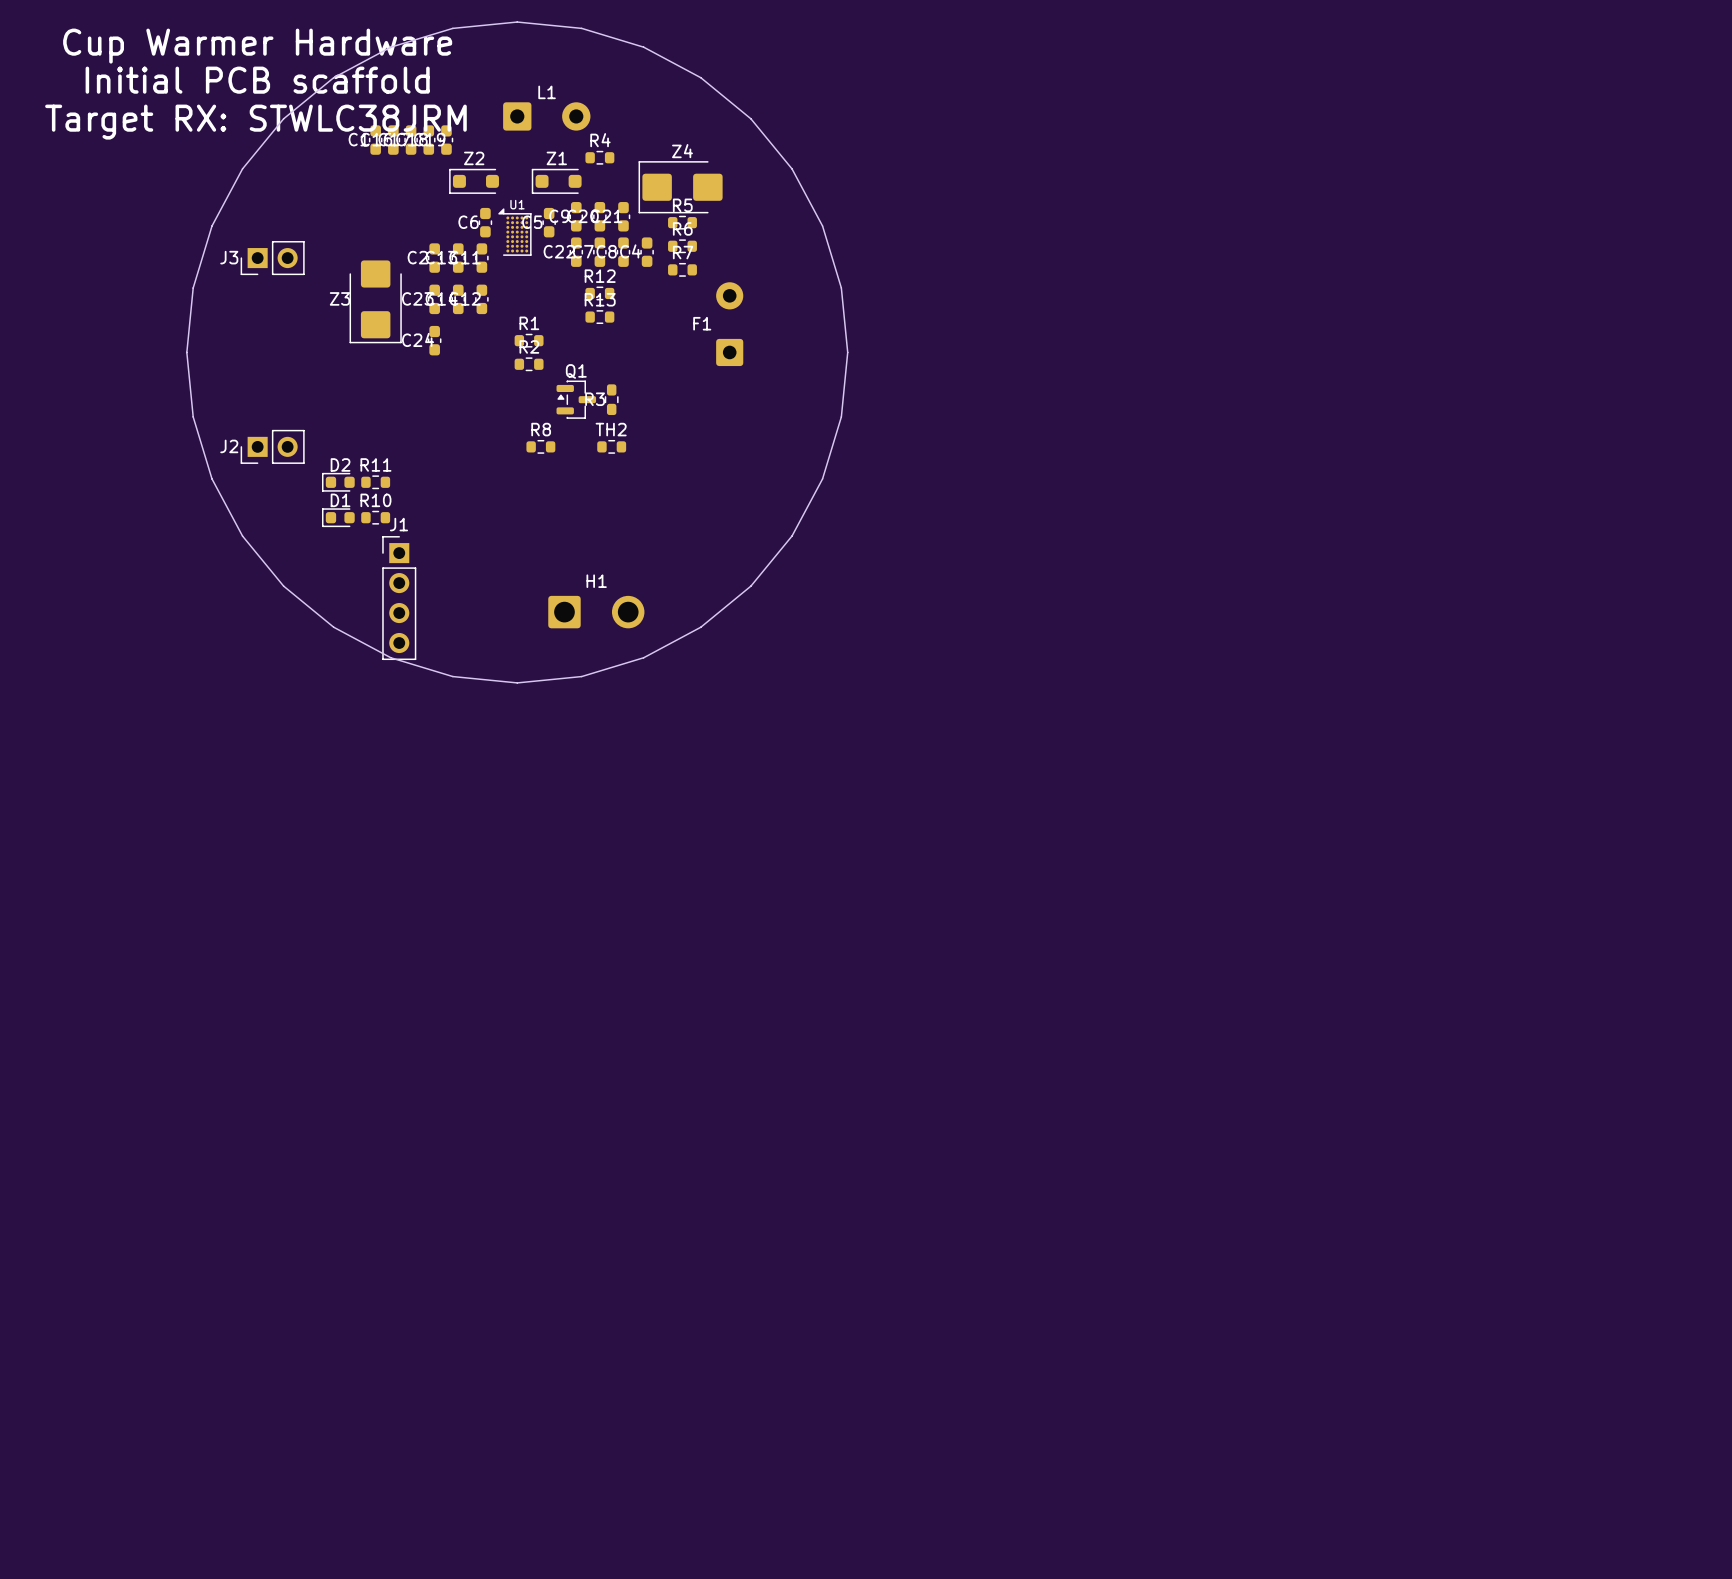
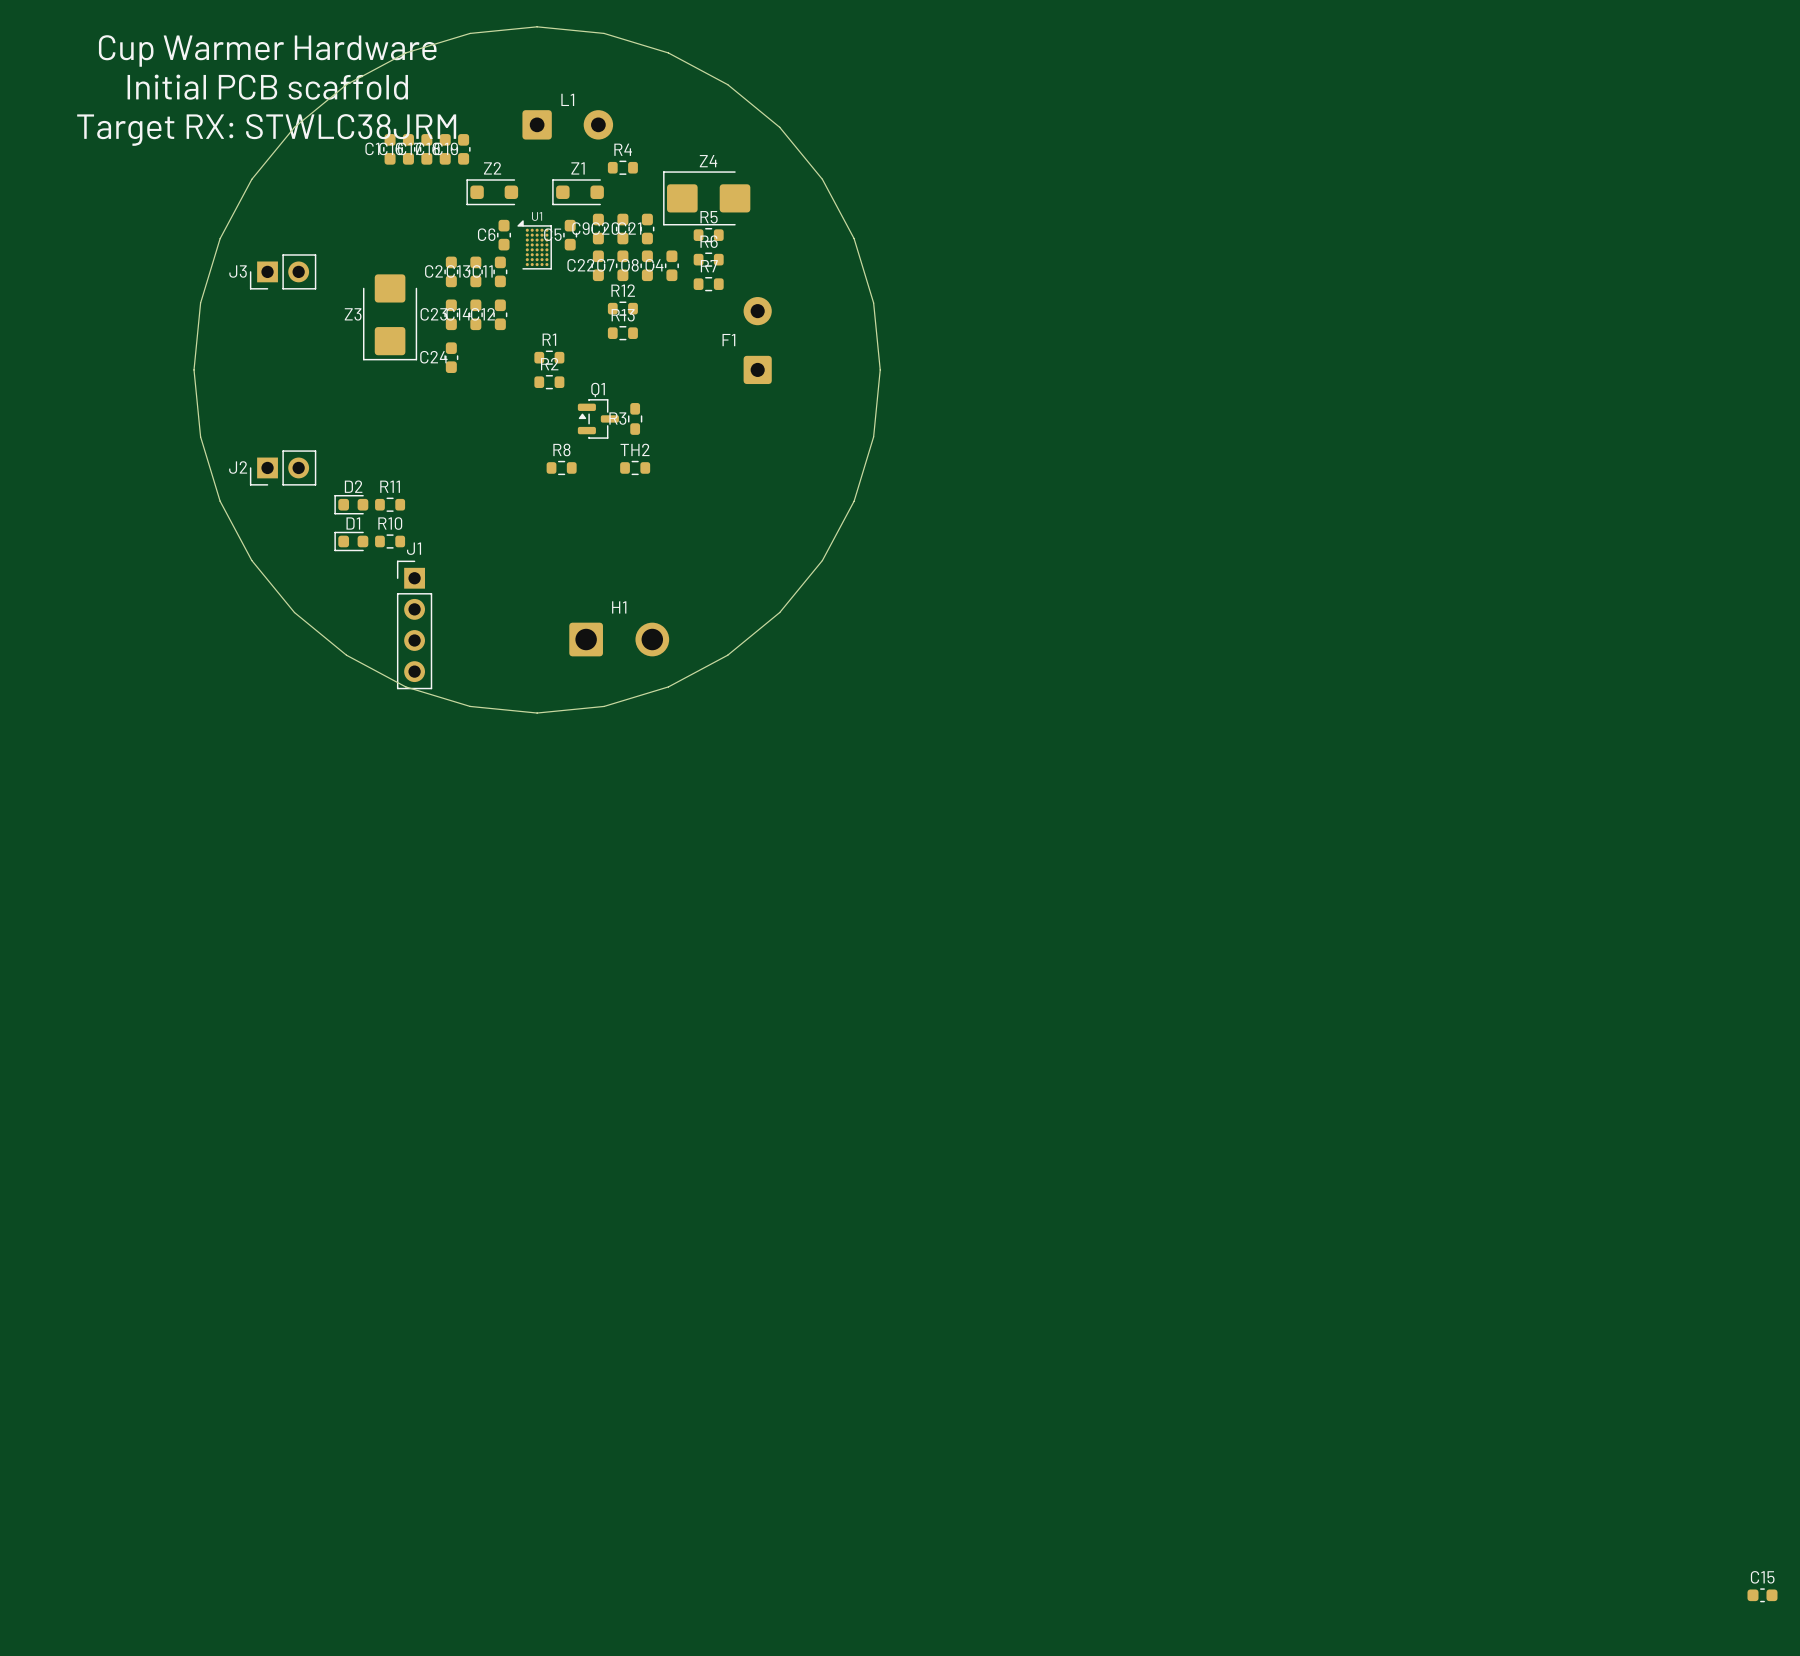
C15: none -> (1762, 1595)

